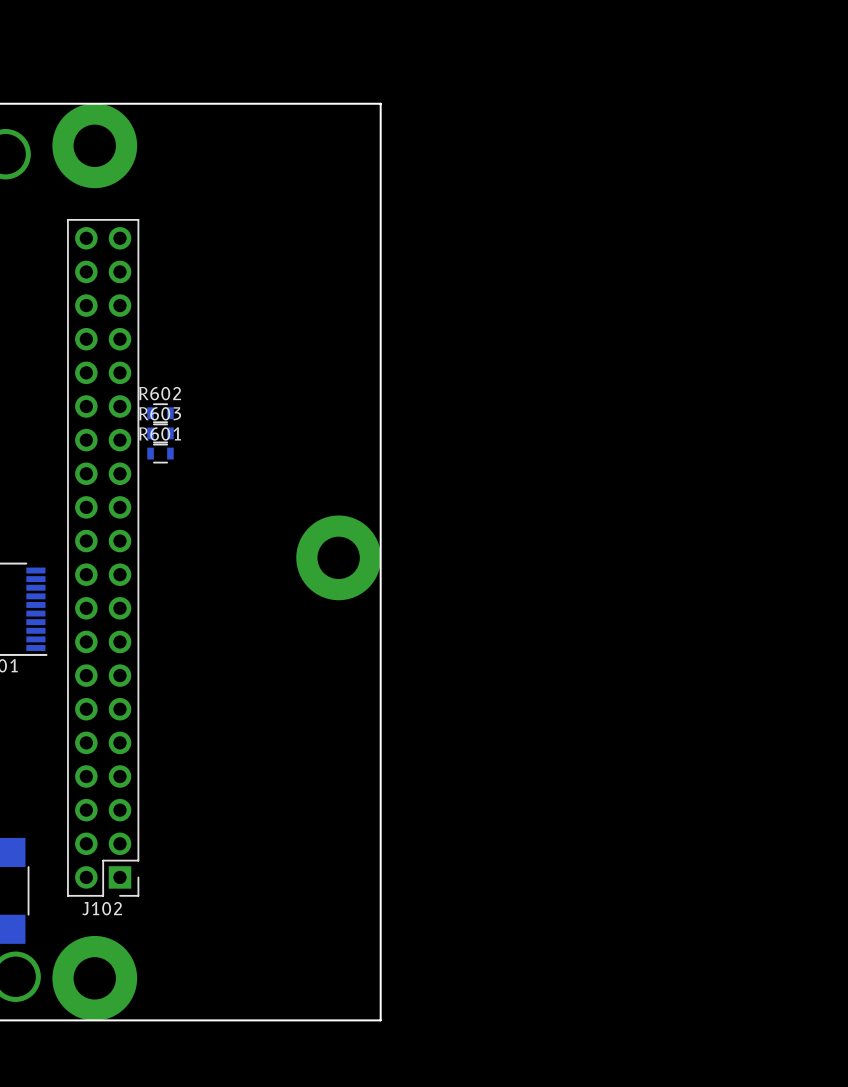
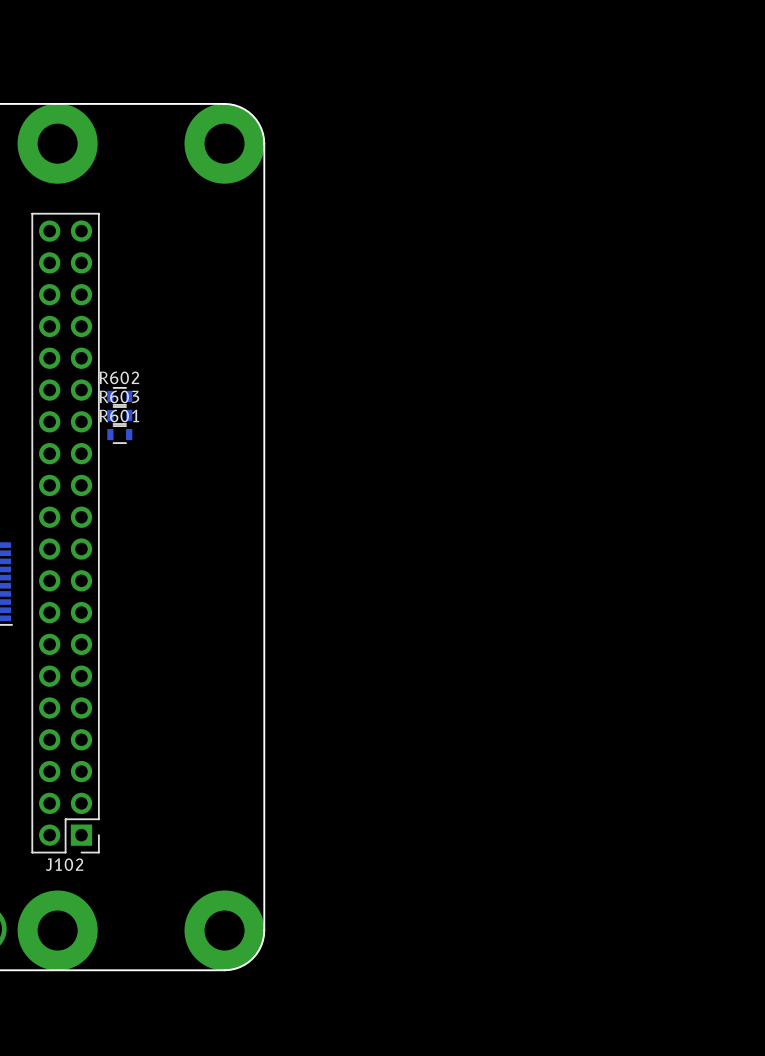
board edge: (271, 103) (380, 103) (380, 1020) (271, 1020) -> (224, 103) (239, 106) (252, 115) (261, 128) (264, 143) (264, 930) (261, 945) (252, 958) (239, 967) (224, 970)
part: none -> (224, 143)
part: (338, 557) -> none
part: none -> (224, 930)

